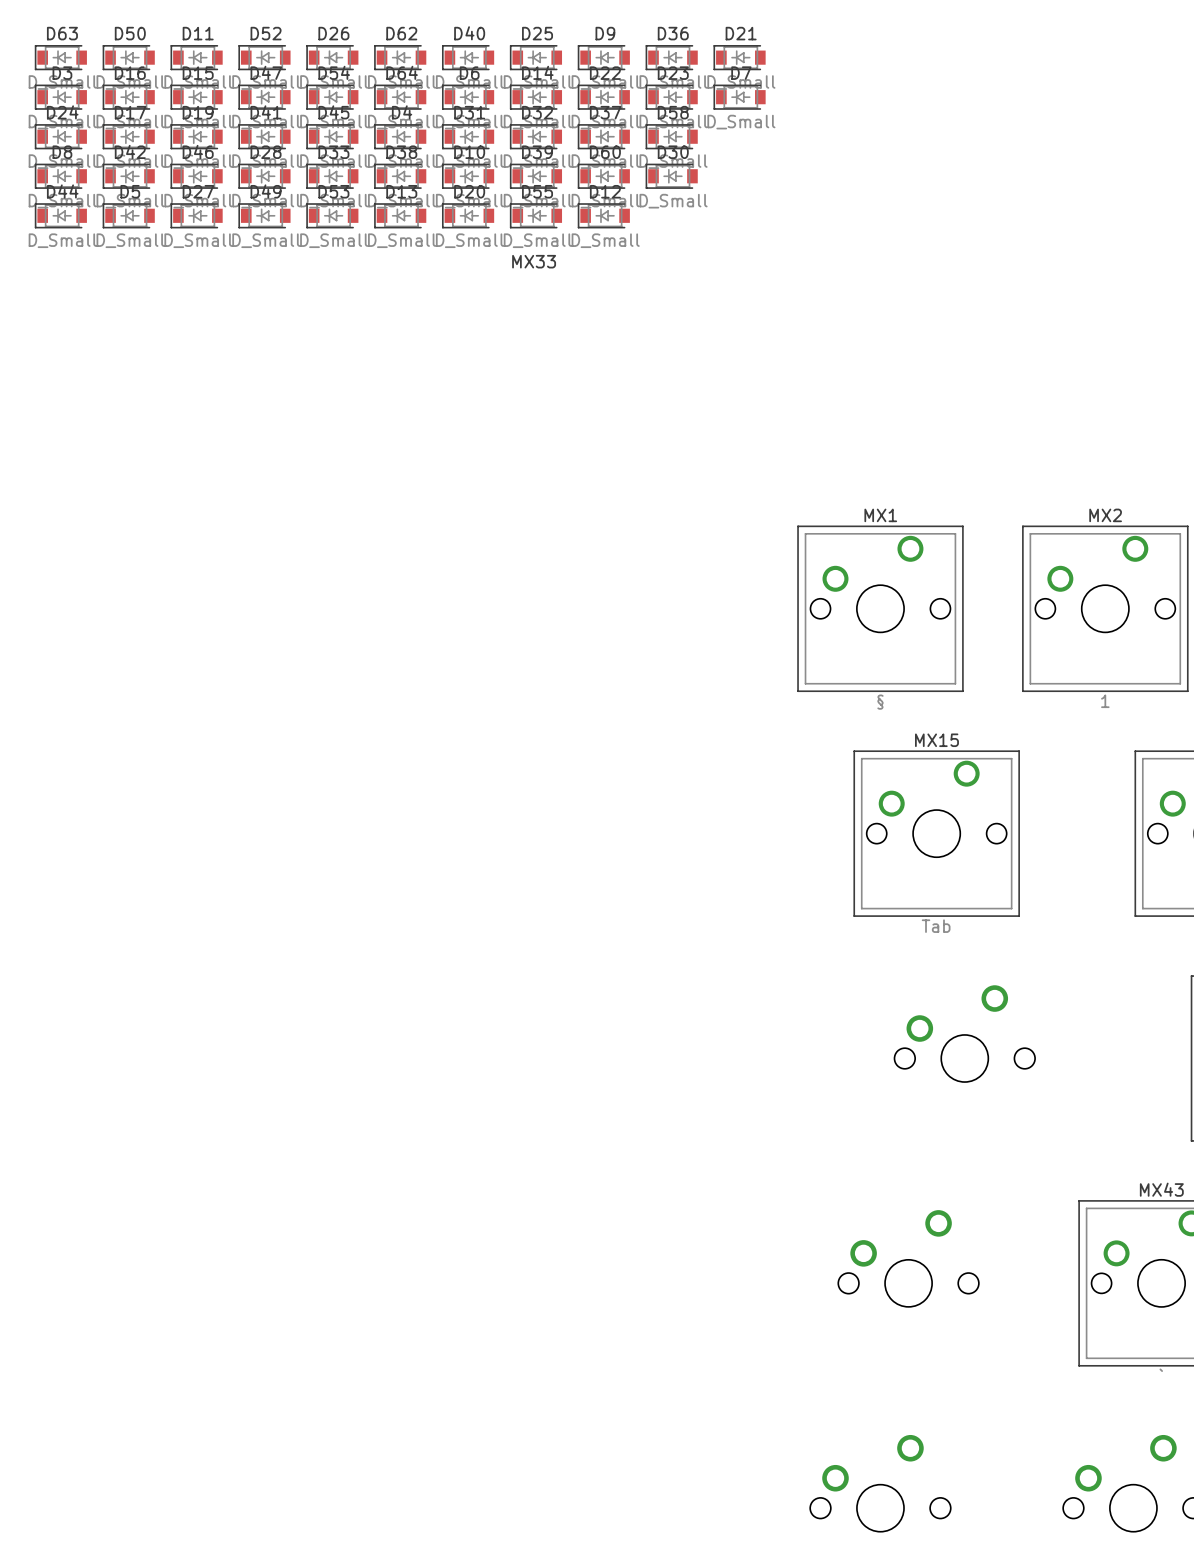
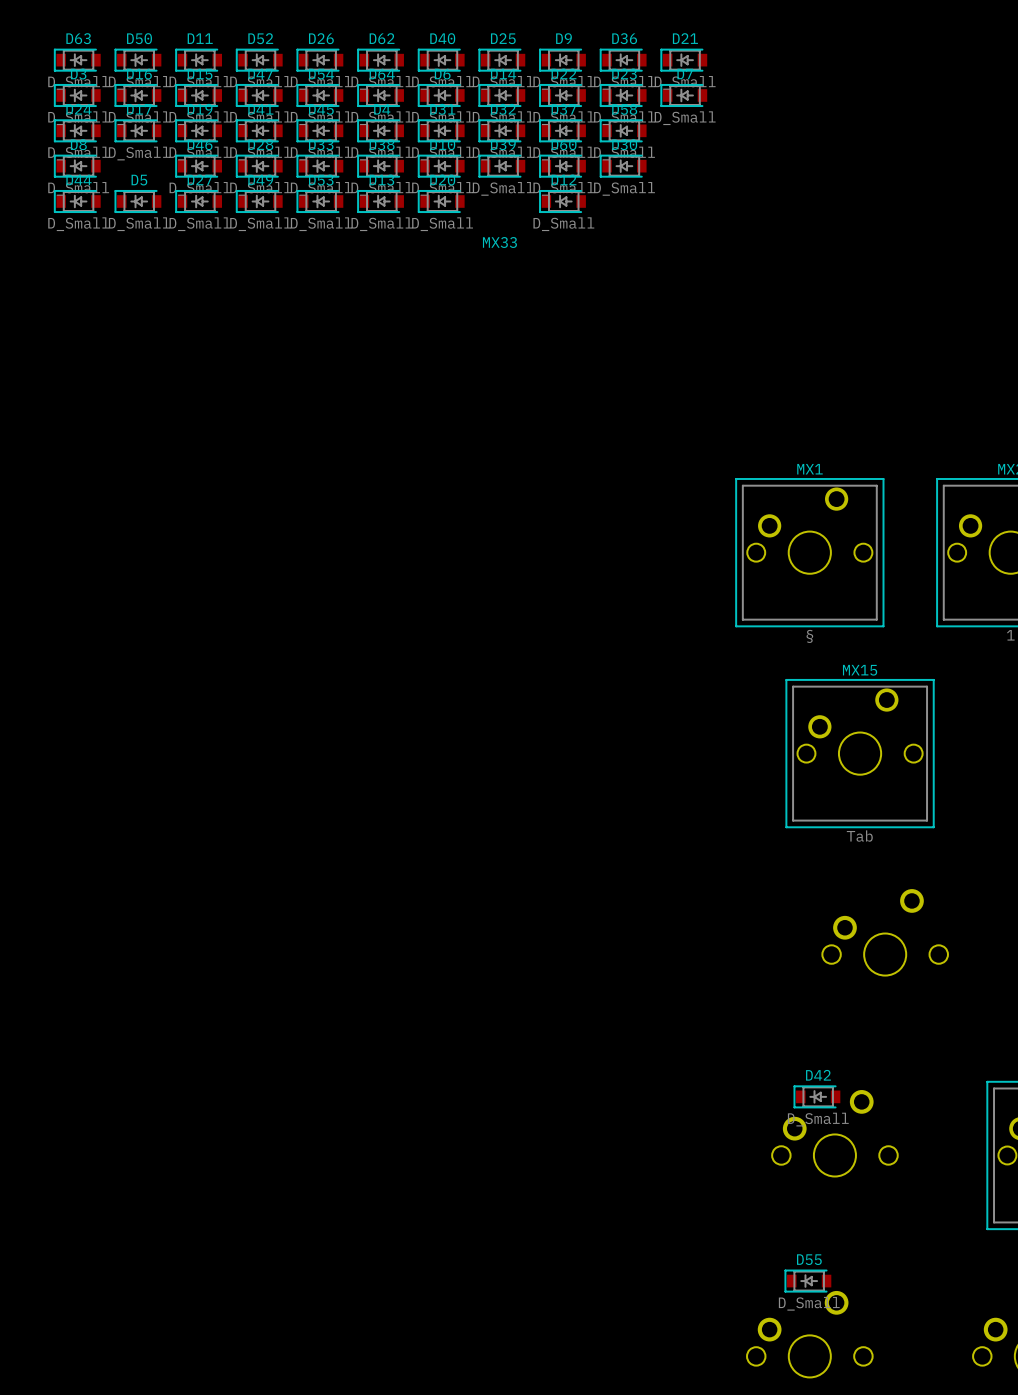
D42 position: (128, 176) -> (817, 1096)
D55 position: (536, 215) -> (808, 1281)

